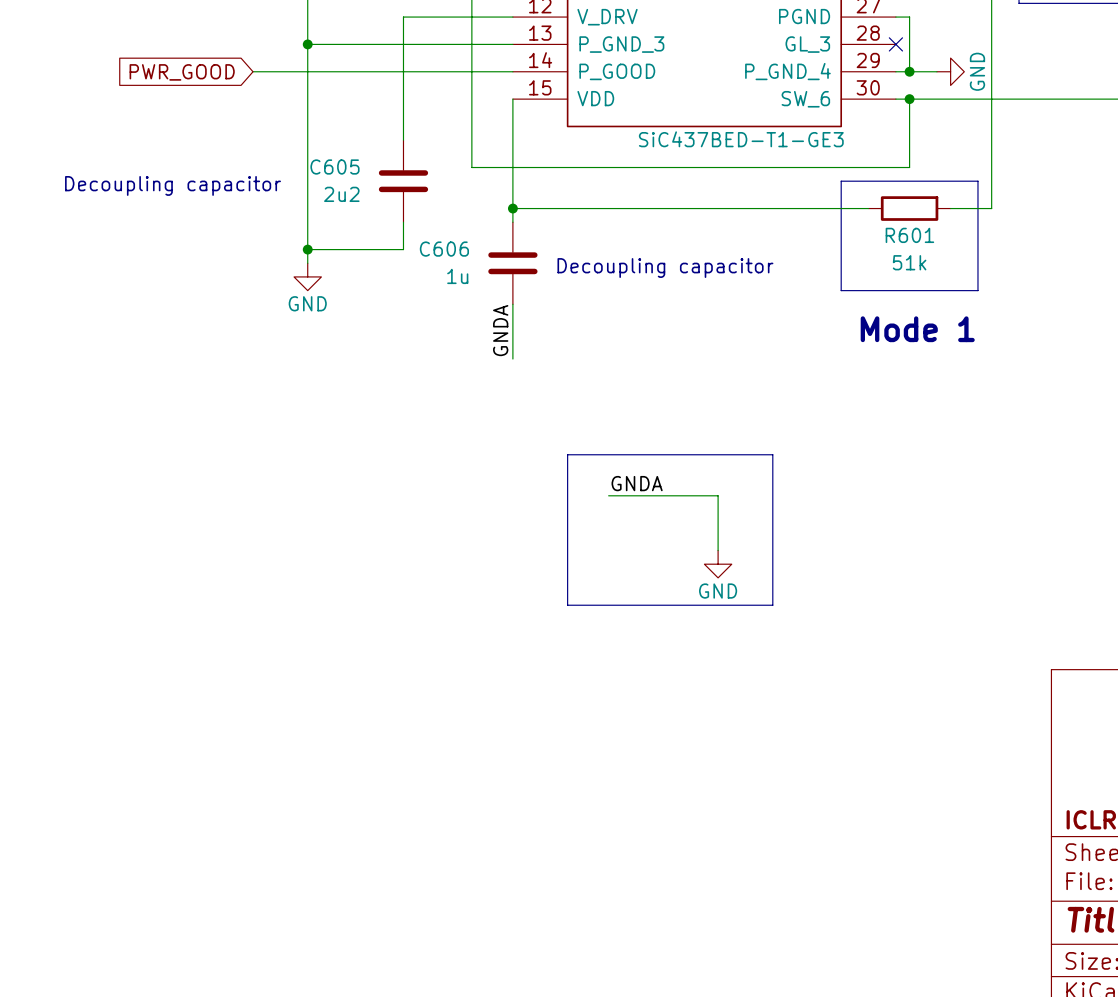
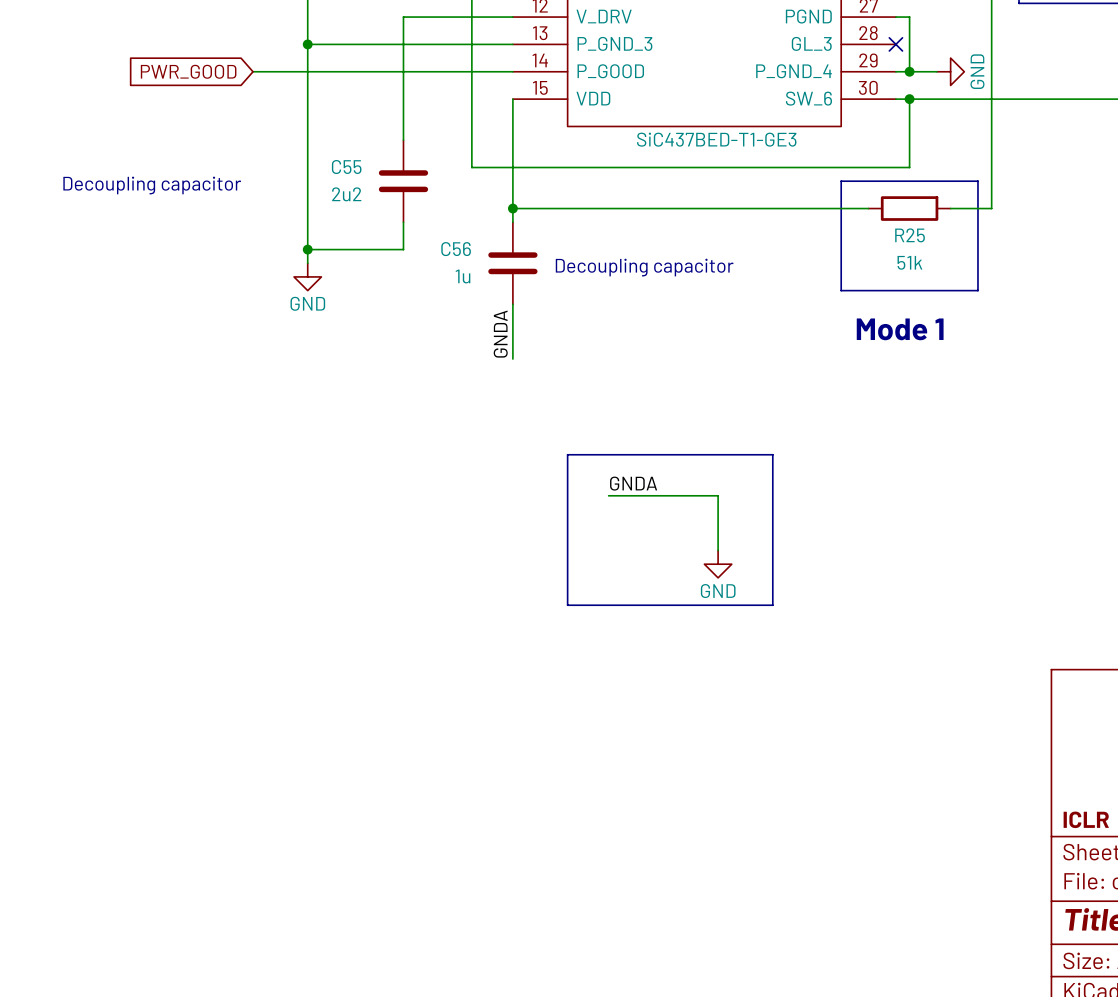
C605 name: C605 (334, 167) -> C55 (346, 167)
R601 name: R601 (909, 235) -> R25 (910, 235)
C606 name: C606 (444, 249) -> C56 (456, 249)

